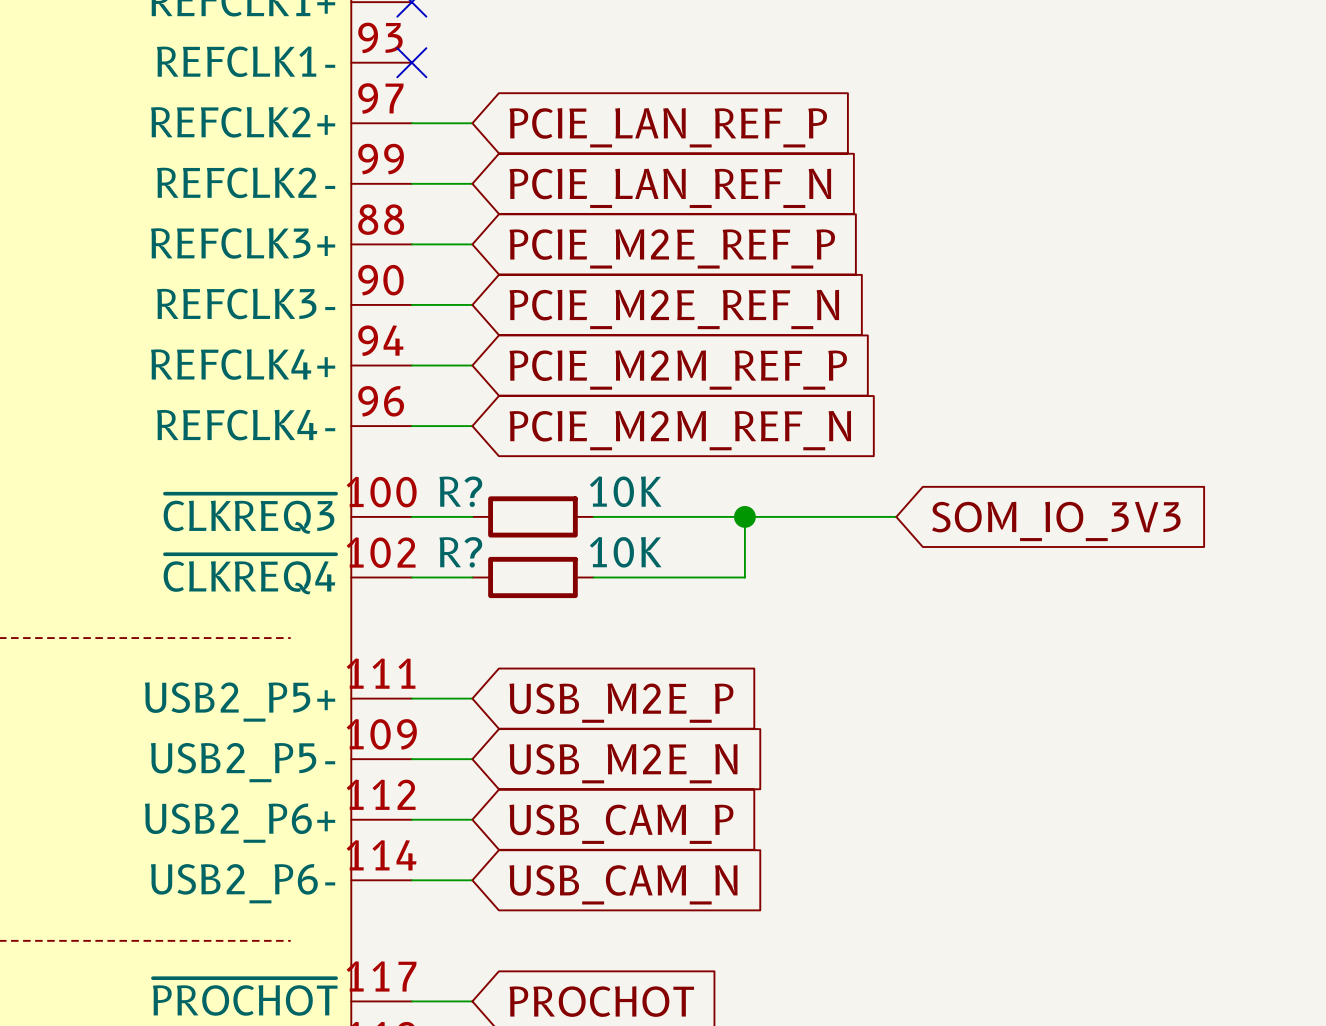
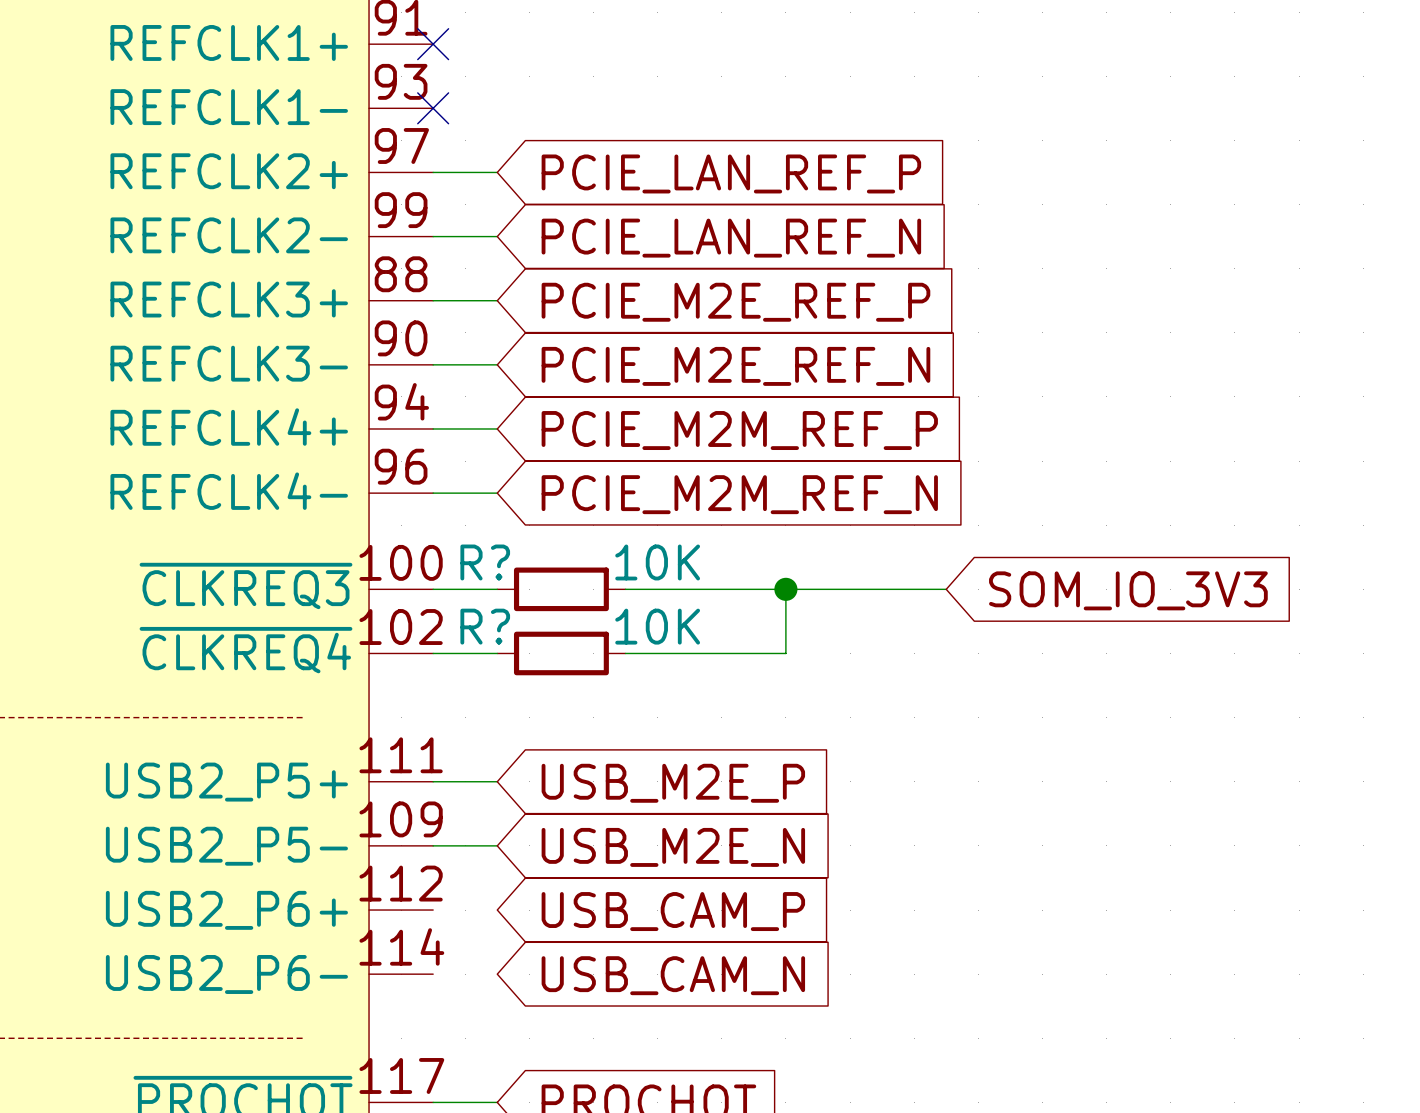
wire: (411, 819) (472, 819) -> none
wire: (411, 880) (472, 880) -> none

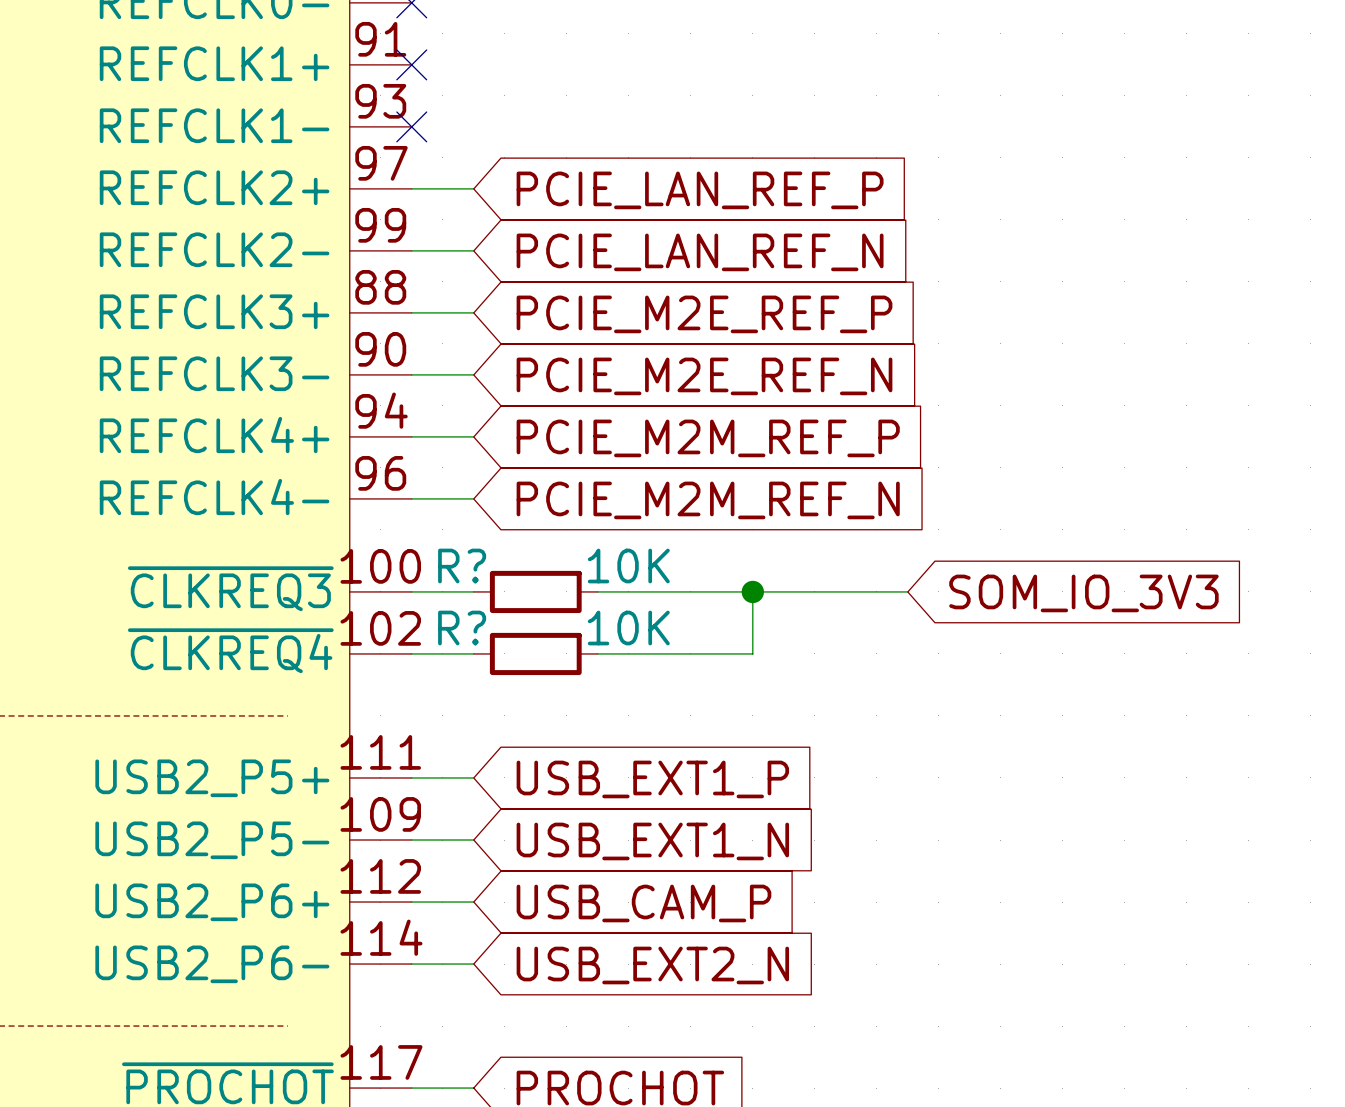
global label: USB_M2E_P (673, 783) -> USB_EXT1_P (652, 779)
global label: USB_M2E_N (673, 847) -> USB_EXT1_N (652, 841)
wire: none -> (411, 902) (473, 902)
wire: none -> (411, 964) (473, 964)
global label: USB_CAM_N (673, 975) -> USB_EXT2_N (652, 965)

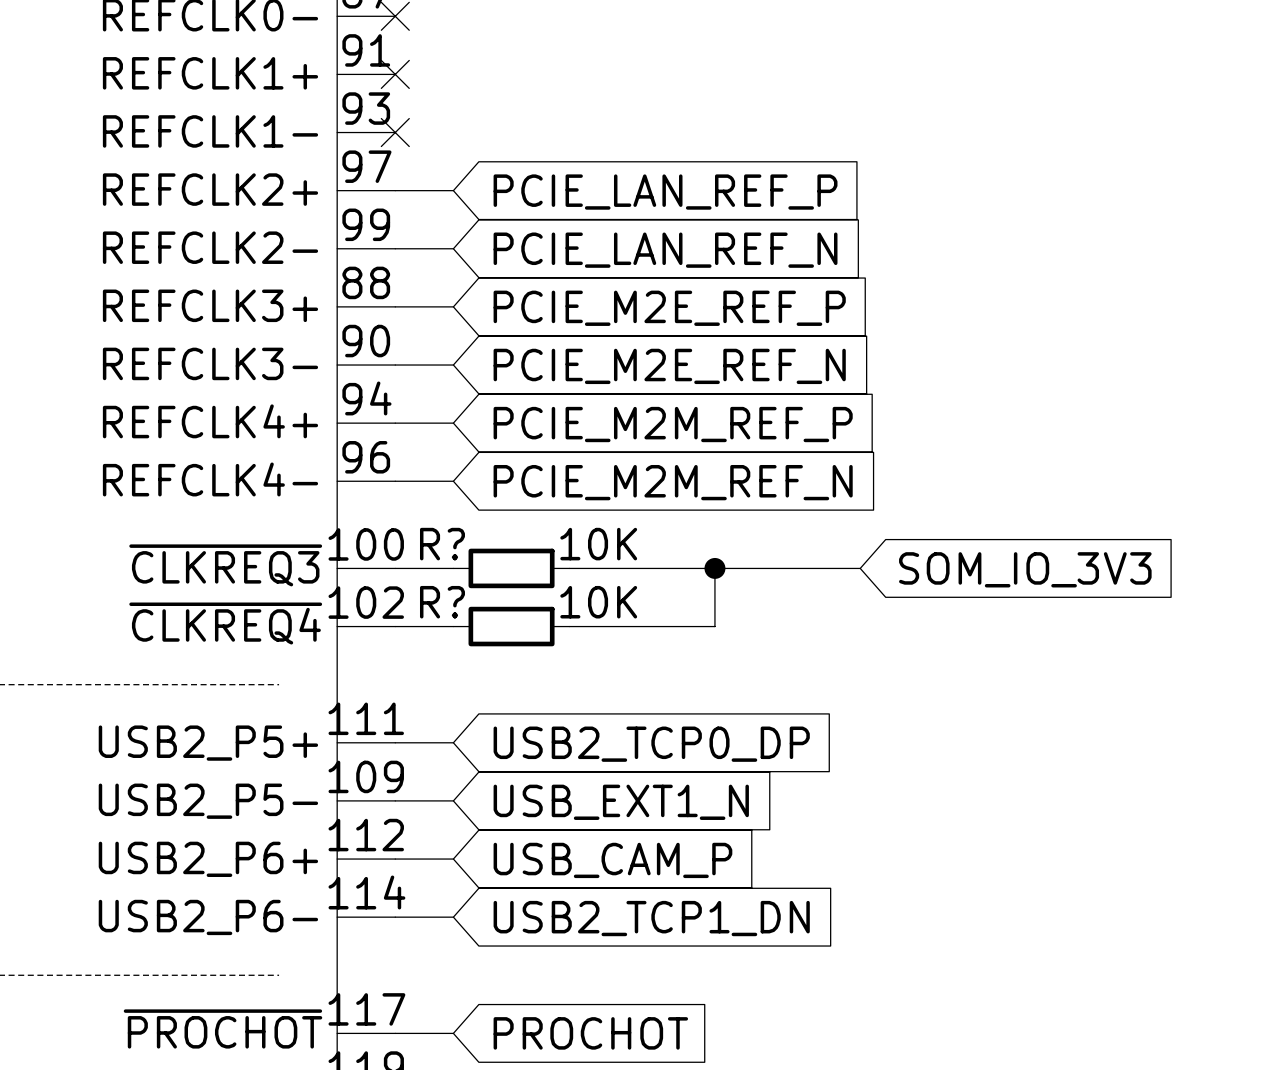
global label: USB_EXT1_P (652, 779) -> USB2_TCP0_DP (651, 744)
global label: USB_EXT2_N (652, 965) -> USB2_TCP1_DN (651, 918)

